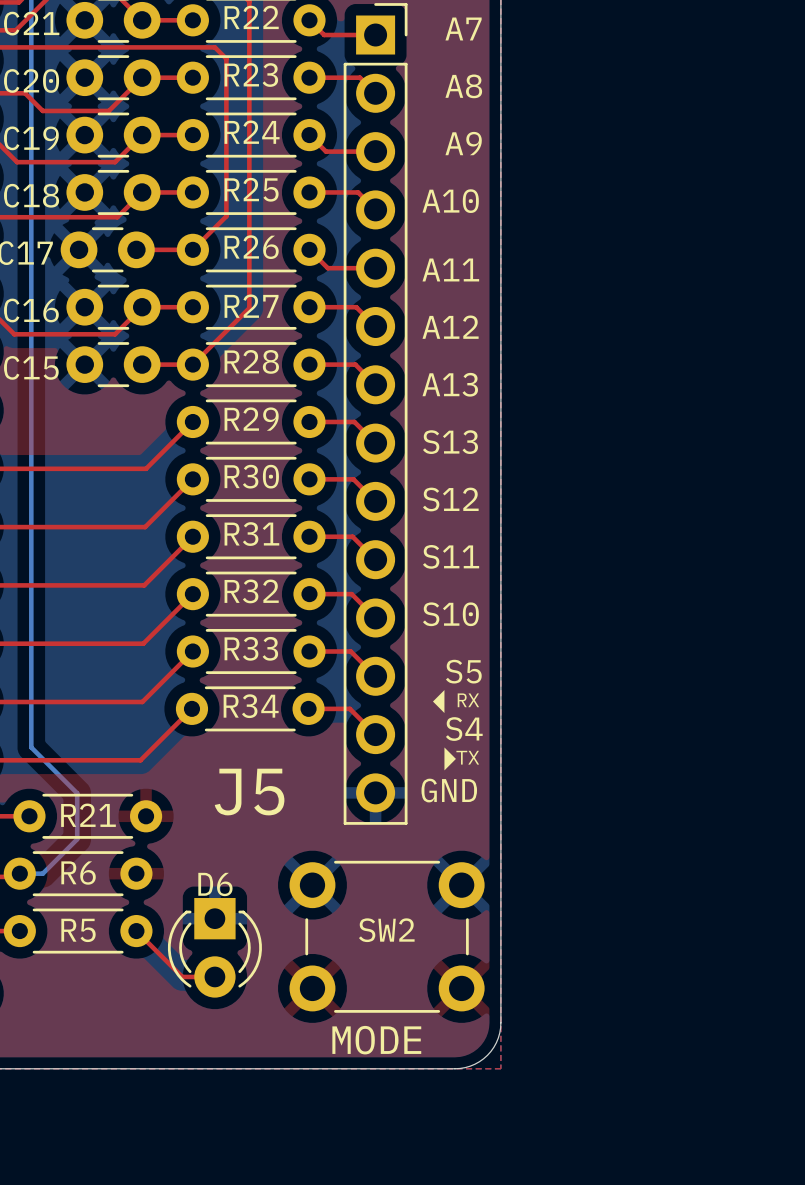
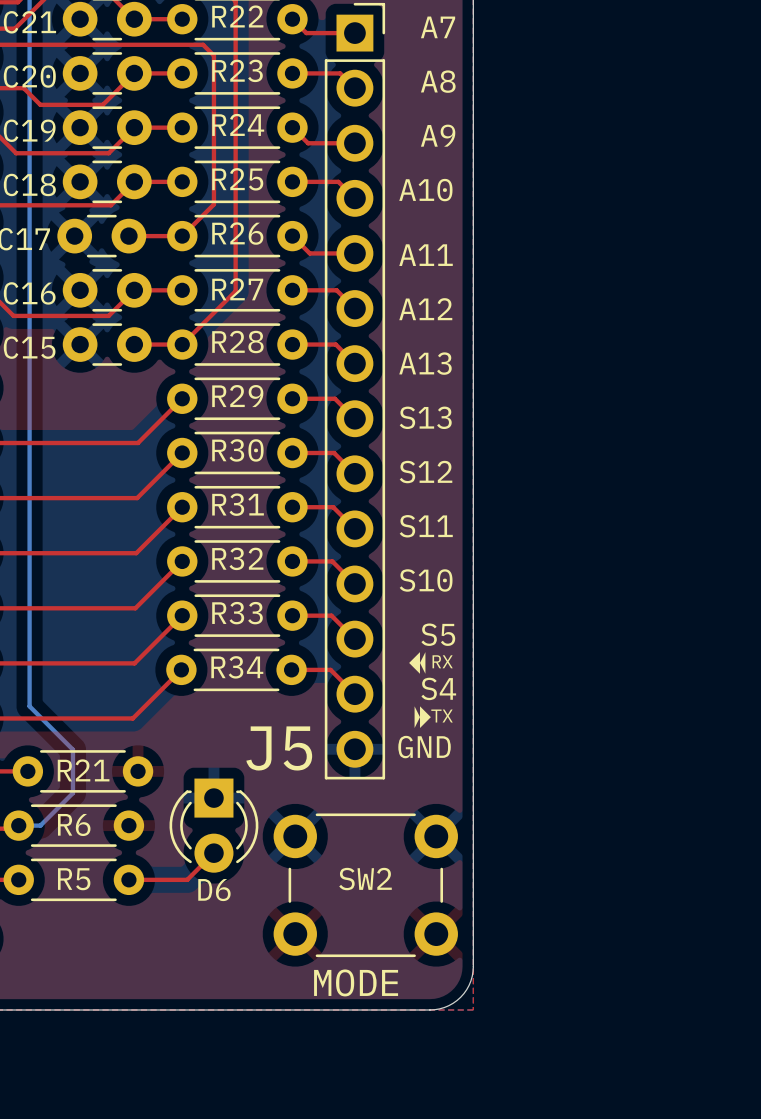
drawing: none -> [420, 652, 426, 674]
drawing: none -> [414, 706, 421, 729]
J5 name position: J5 (249, 792) -> J5 (279, 748)
D6 name position: D6 (215, 884) -> D6 (214, 890)
top track: (136, 931) (182, 976) (214, 976) -> (128, 879) (187, 879) (213, 853)
D6 position: (214, 947) -> (213, 825)

